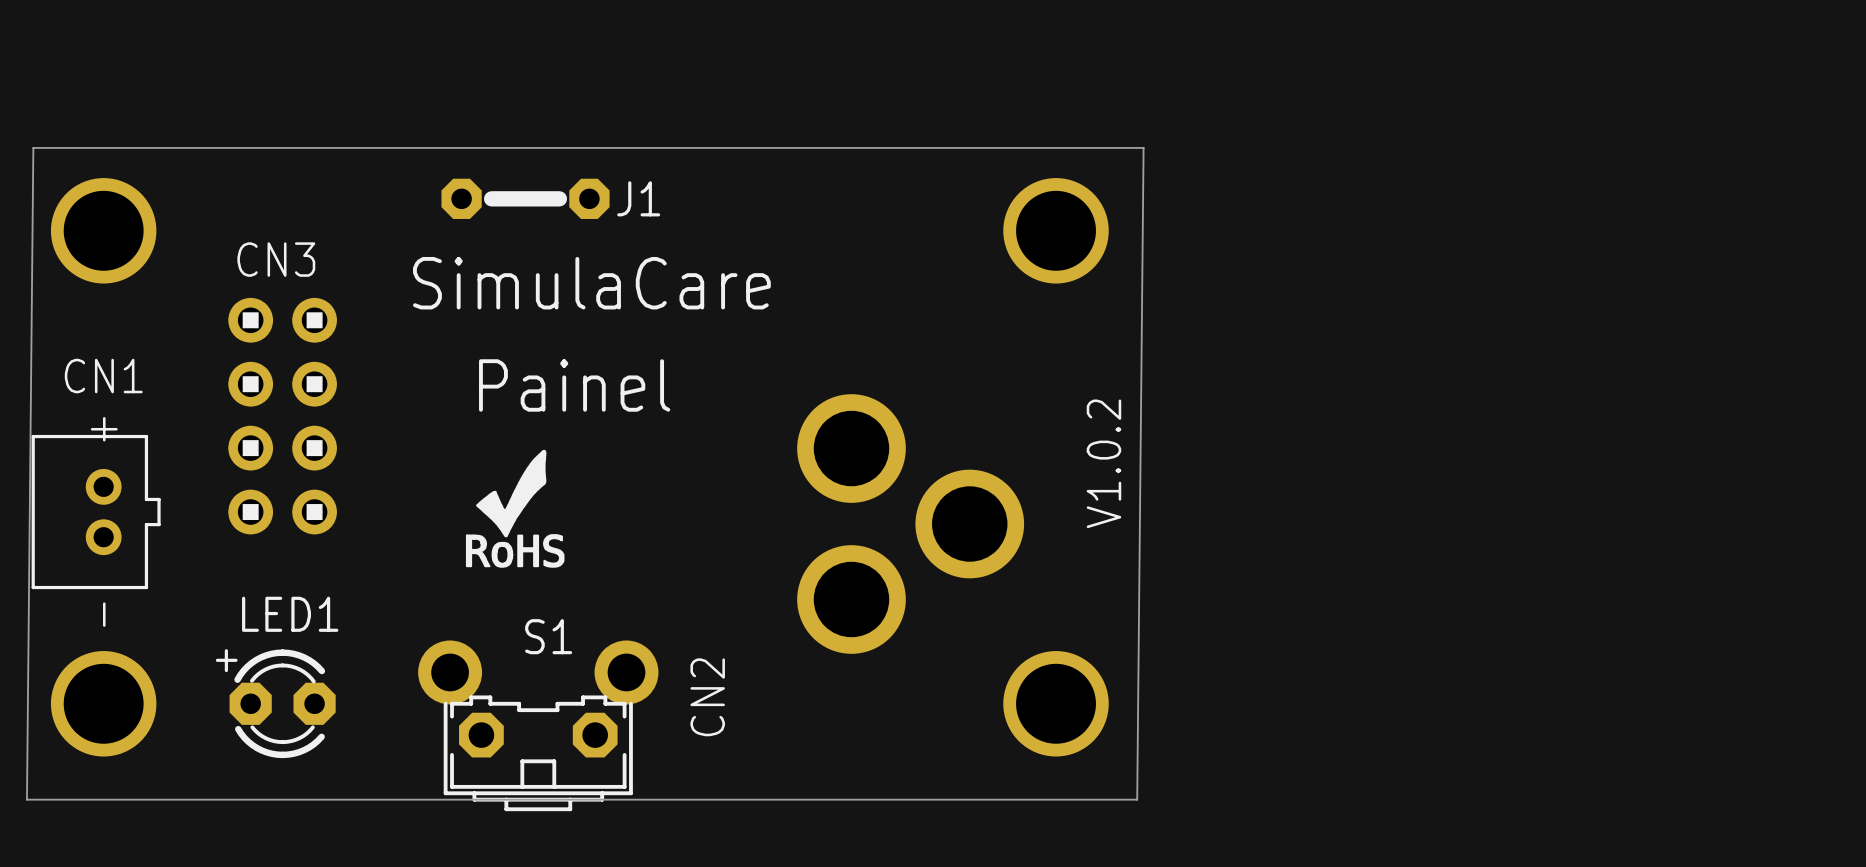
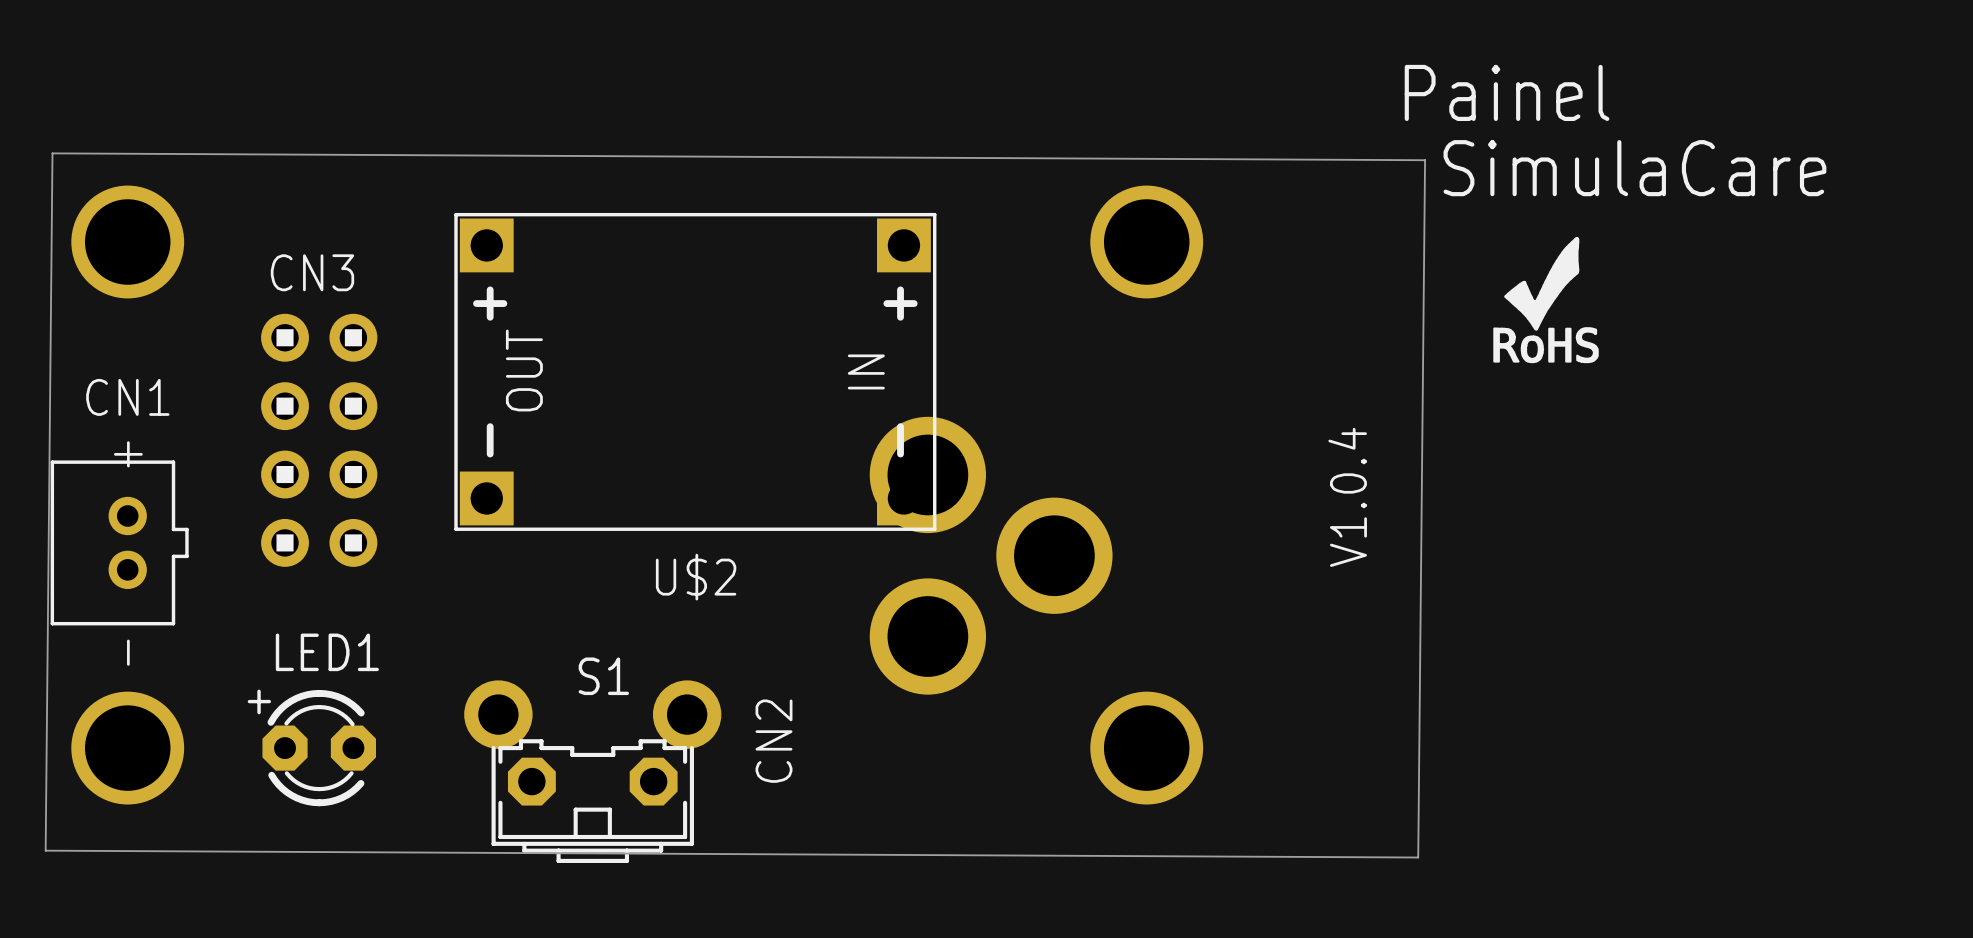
text: none -> Painel (1507, 92)
board edge: (33, 147) (1143, 147) (1137, 799) (26, 799) -> (52, 153) (1425, 160) (1418, 857) (45, 850)
text: none -> SimulaCare (1634, 168)
J1: (525, 198) -> none
drawing: none -> [1493, 236, 1599, 364]
text: SimulaCare (591, 283) -> none
U$2: none -> (695, 371)
text: Painel (574, 385) -> none
drawing: [465, 449, 565, 568] -> none
text: V1.0.2 (1103, 463) -> none
text: none -> V1.0.4 (1347, 497)

